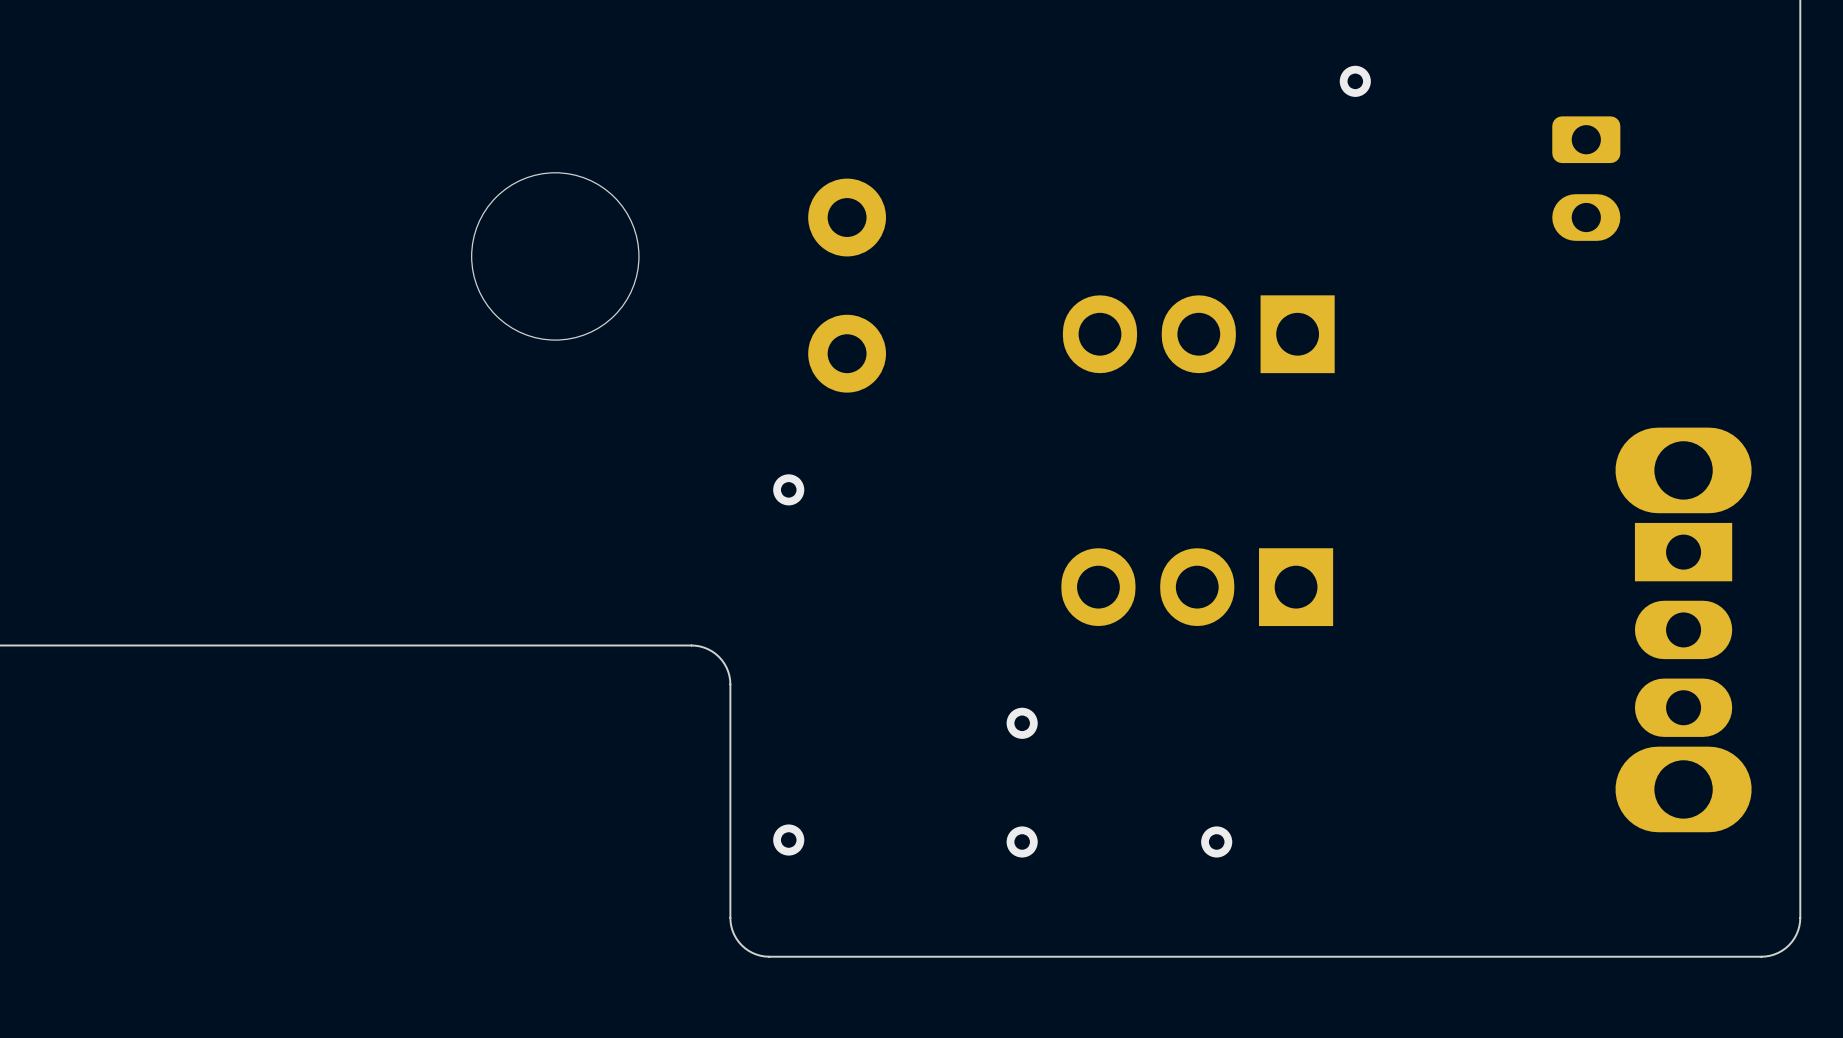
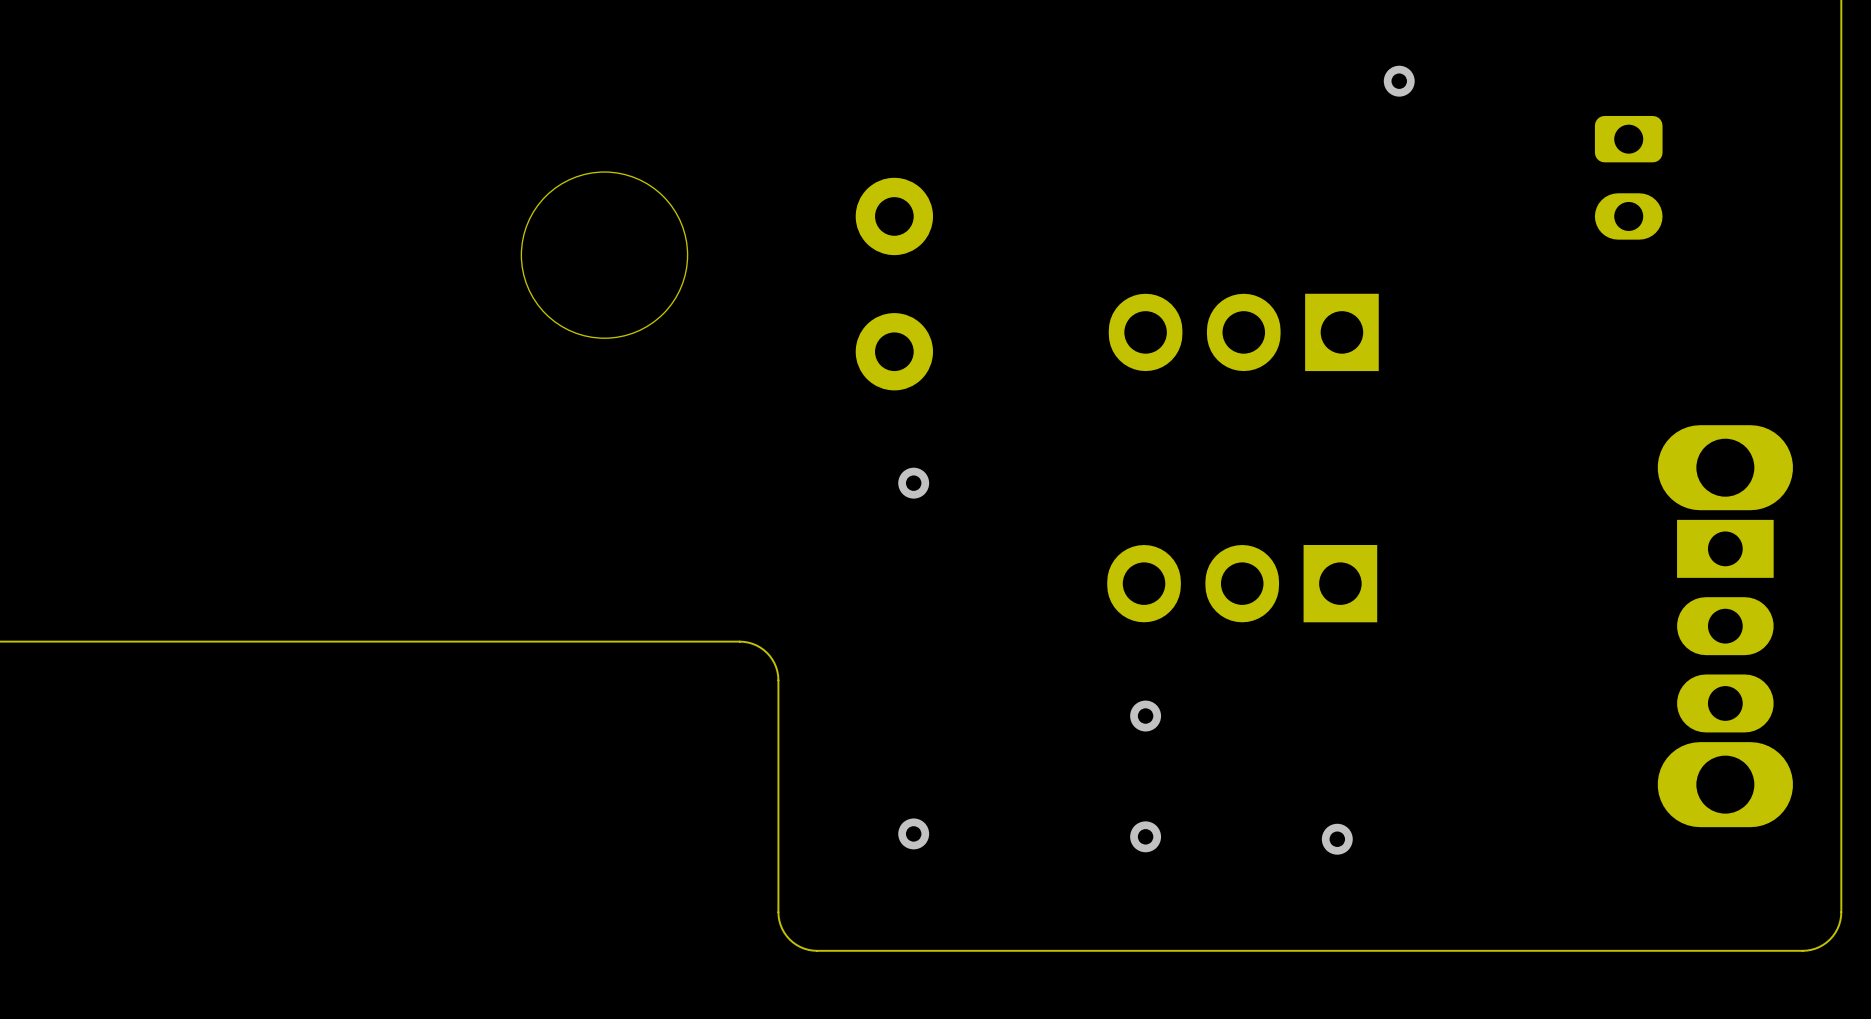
via position: (788, 489) -> (913, 483)
via: none -> (1145, 716)
via: (1022, 723) -> none
via: none -> (913, 833)
via: (788, 840) -> none
via: (1022, 841) -> none
via: none -> (1145, 836)
via: (1216, 841) -> none
via: none -> (1337, 839)

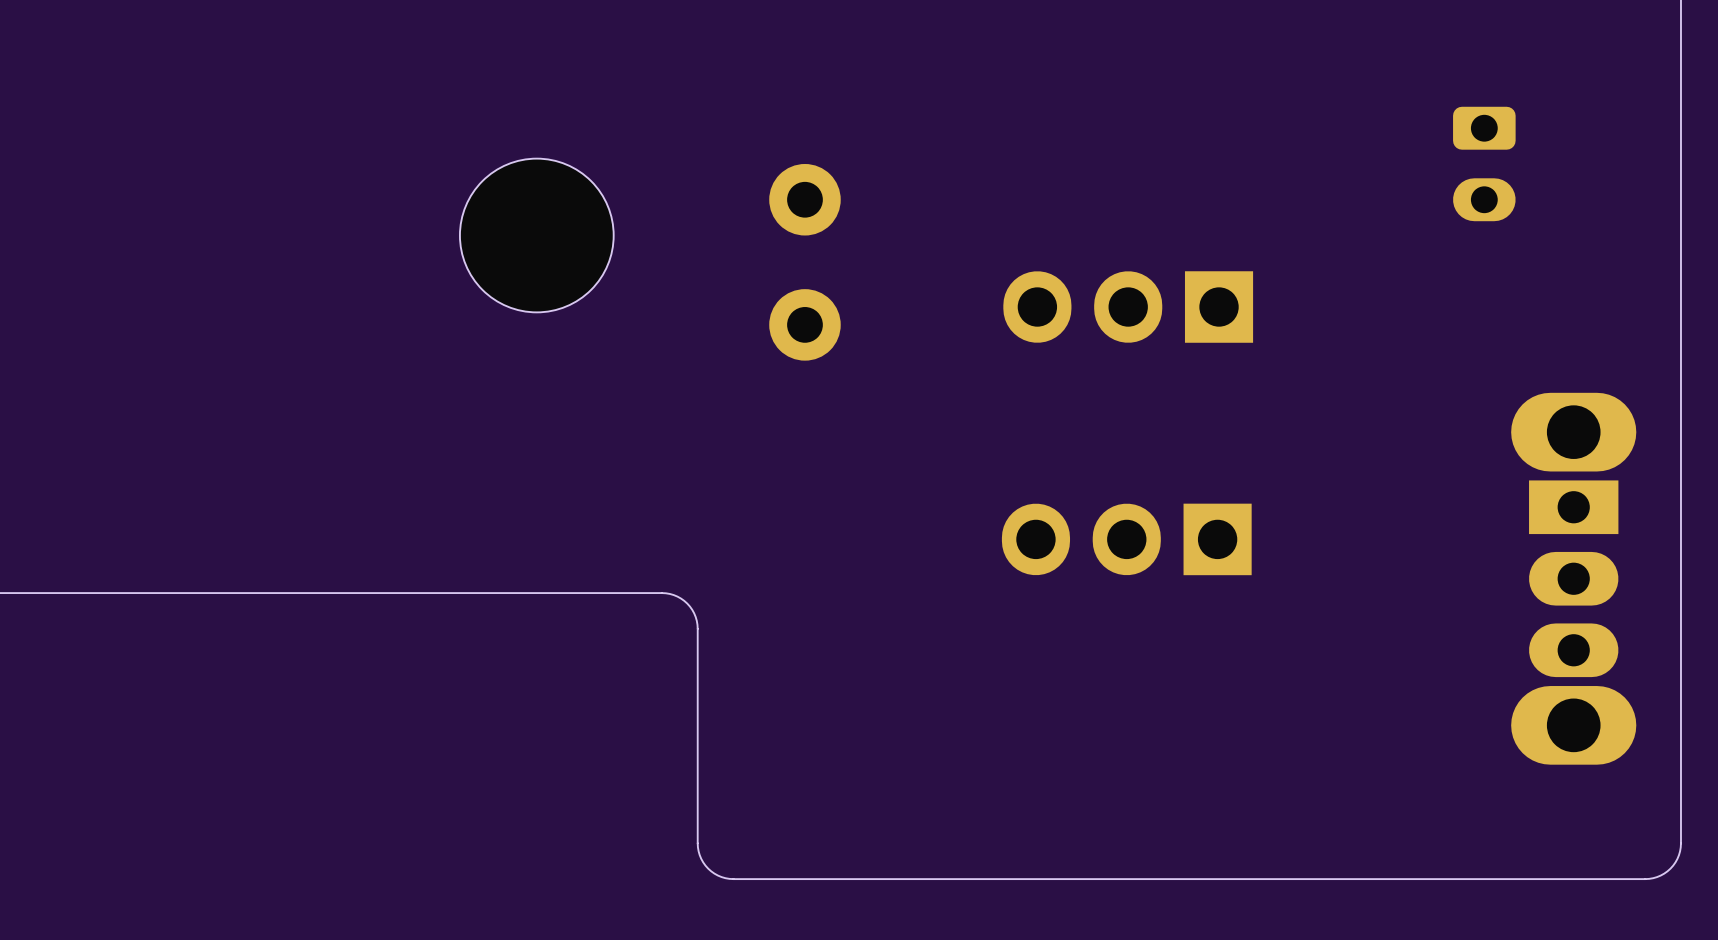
via: (1399, 81) -> none
via: (913, 483) -> none
via: (1145, 716) -> none
via: (913, 833) -> none
via: (1145, 836) -> none
via: (1337, 839) -> none

